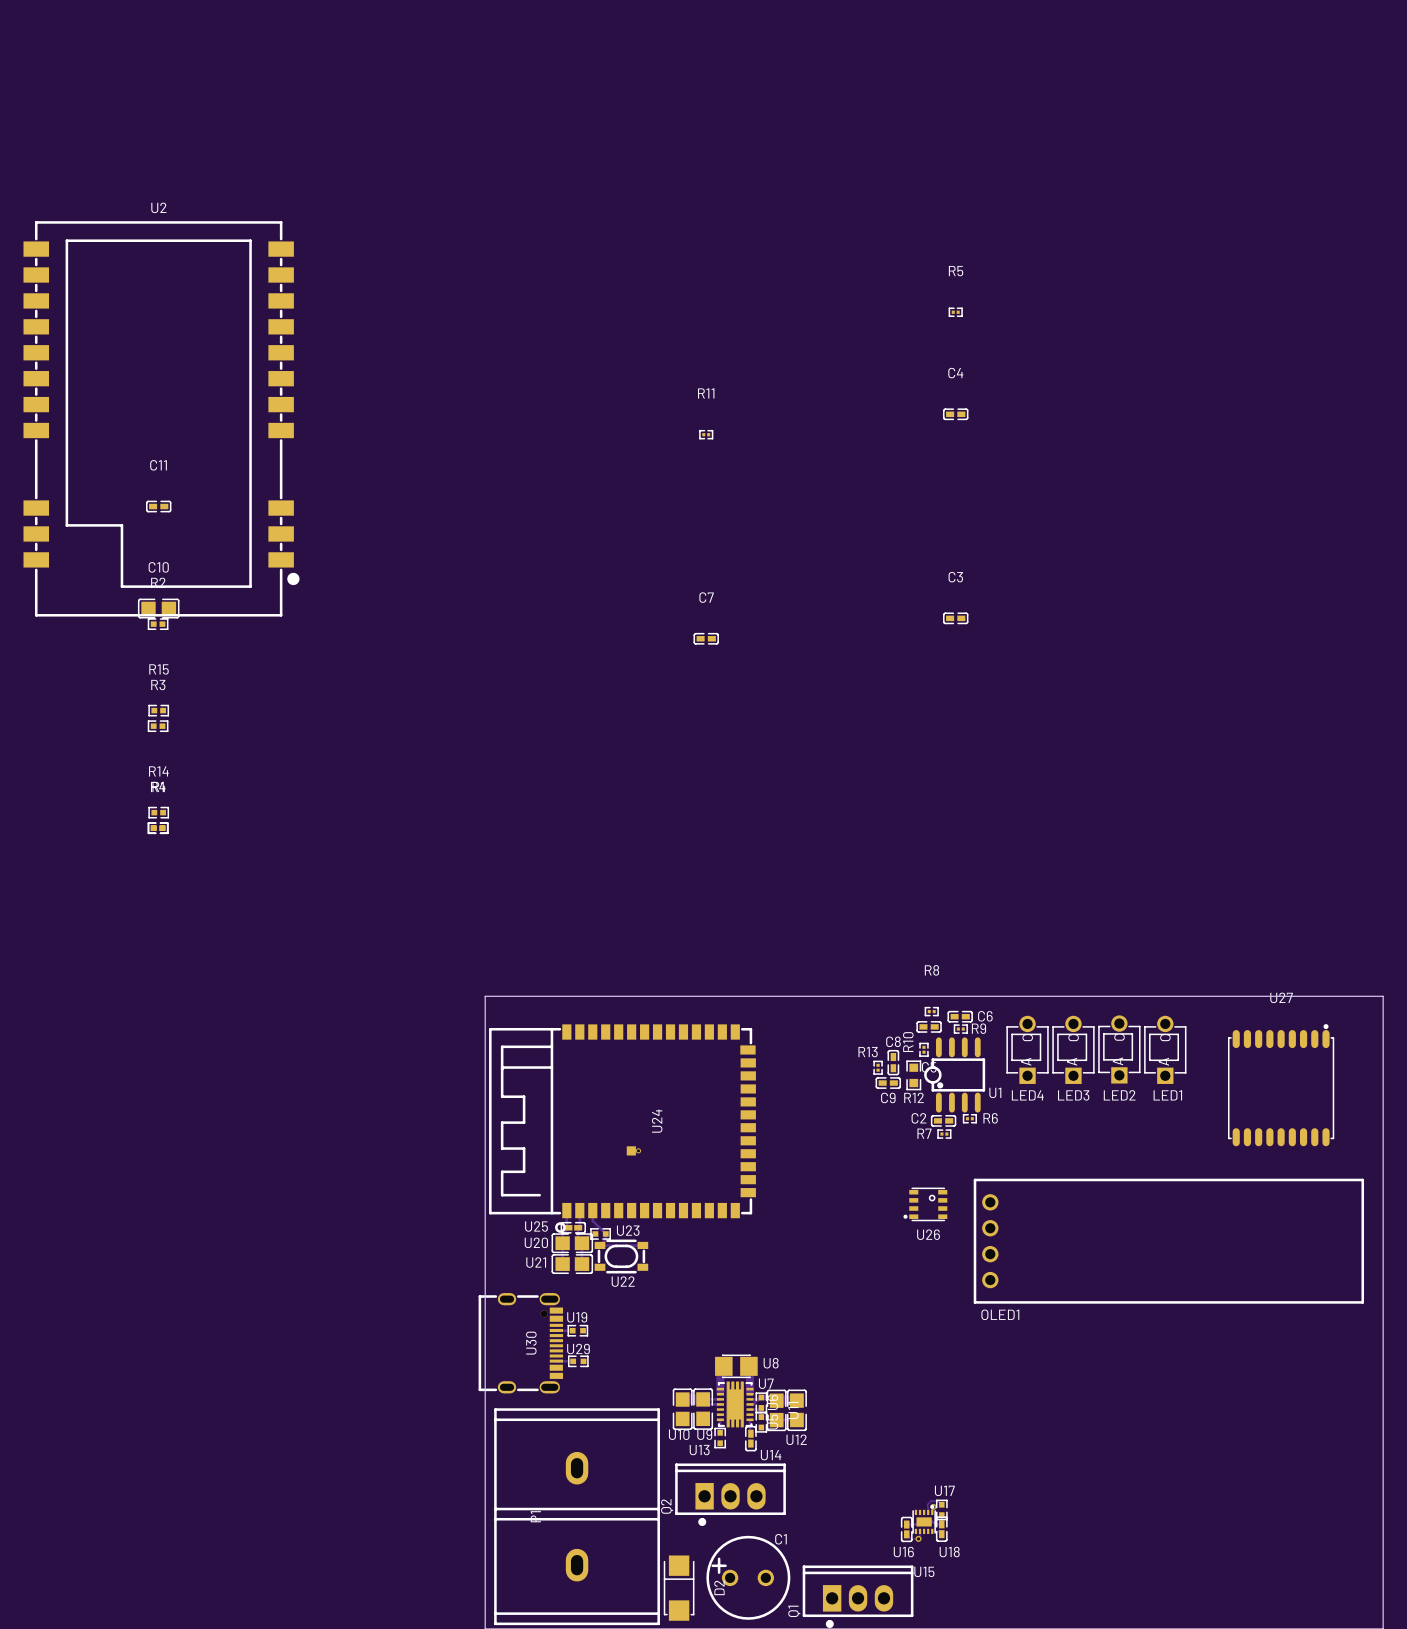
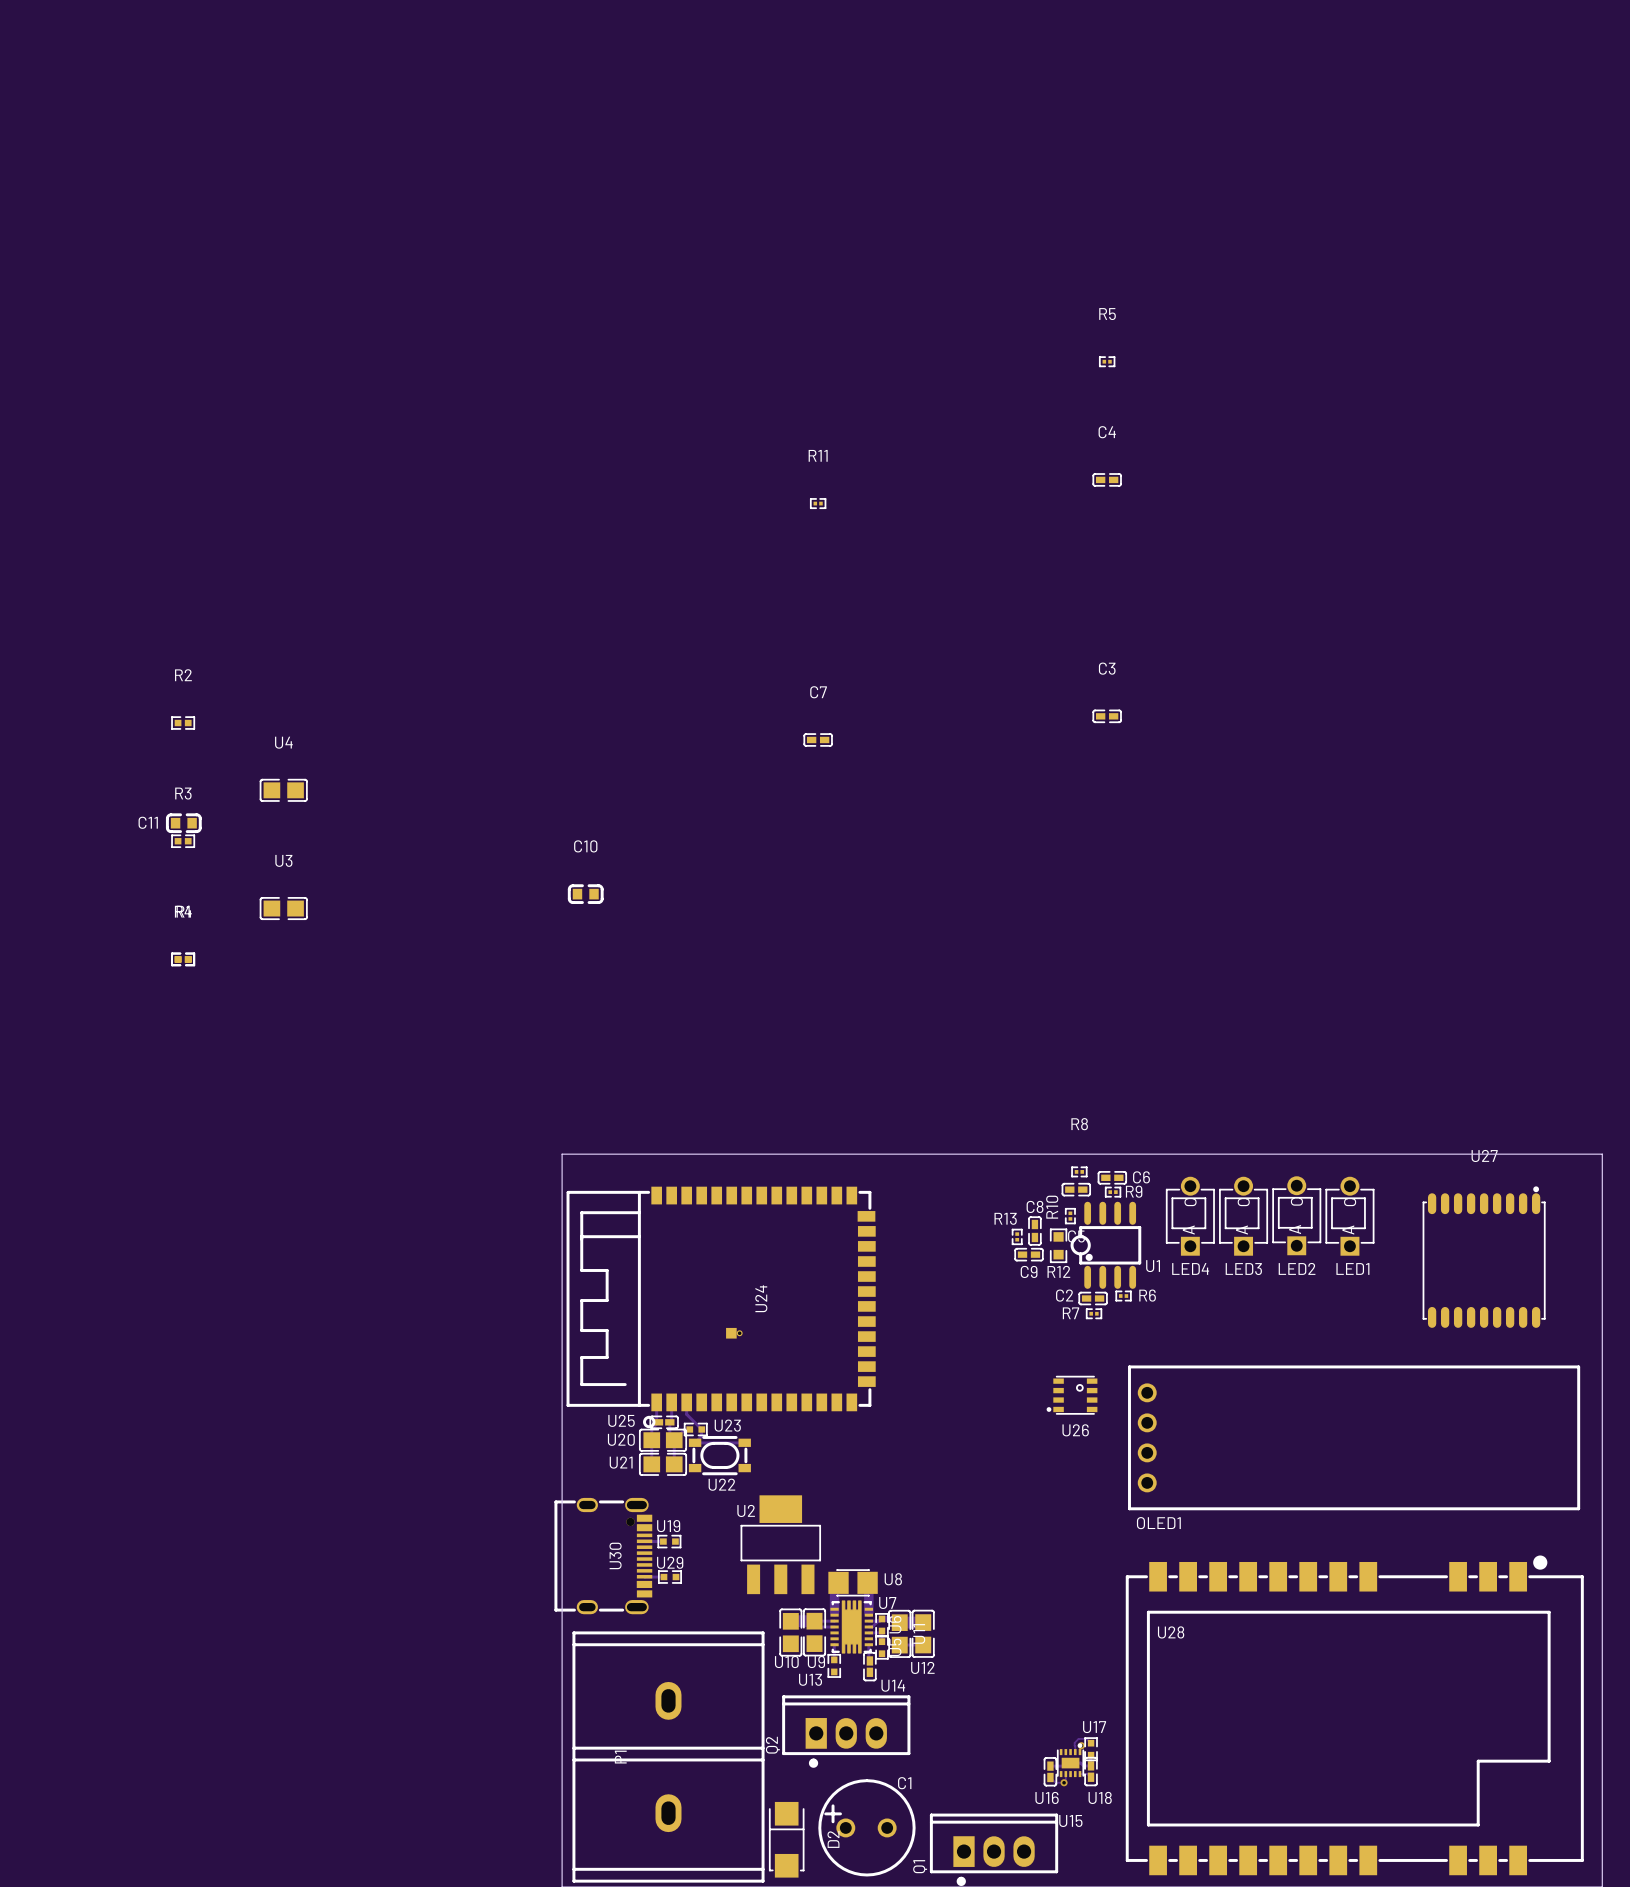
U2 name position: U2 (158, 207) -> U2 (746, 1510)
U2 footprint: [23, 221, 300, 617] -> [740, 1495, 822, 1595]
C11 name position: C11 (158, 465) -> C11 (148, 822)
C11 footprint: [145, 500, 172, 513] -> [165, 813, 202, 834]
C10 footprint: [137, 598, 180, 619] -> [567, 884, 604, 904]
U4: none -> (283, 790)
R15: (158, 710) -> none
U3: none -> (283, 908)
R14: (158, 812) -> none
U28: none -> (1354, 1715)

